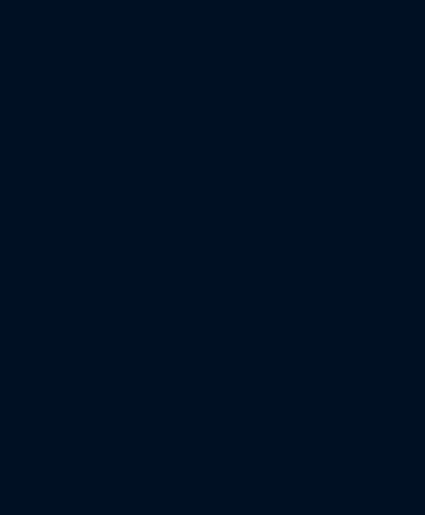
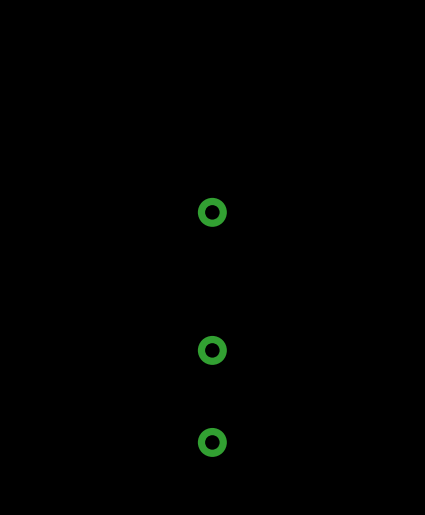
via: none -> (212, 212)
via: none -> (212, 350)
via: none -> (212, 442)

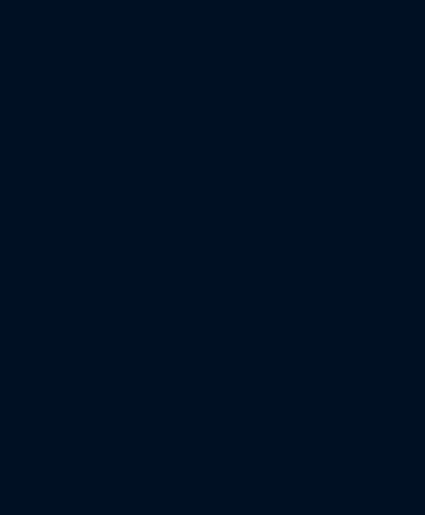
via: (212, 212) -> none
via: (212, 350) -> none
via: (212, 442) -> none

